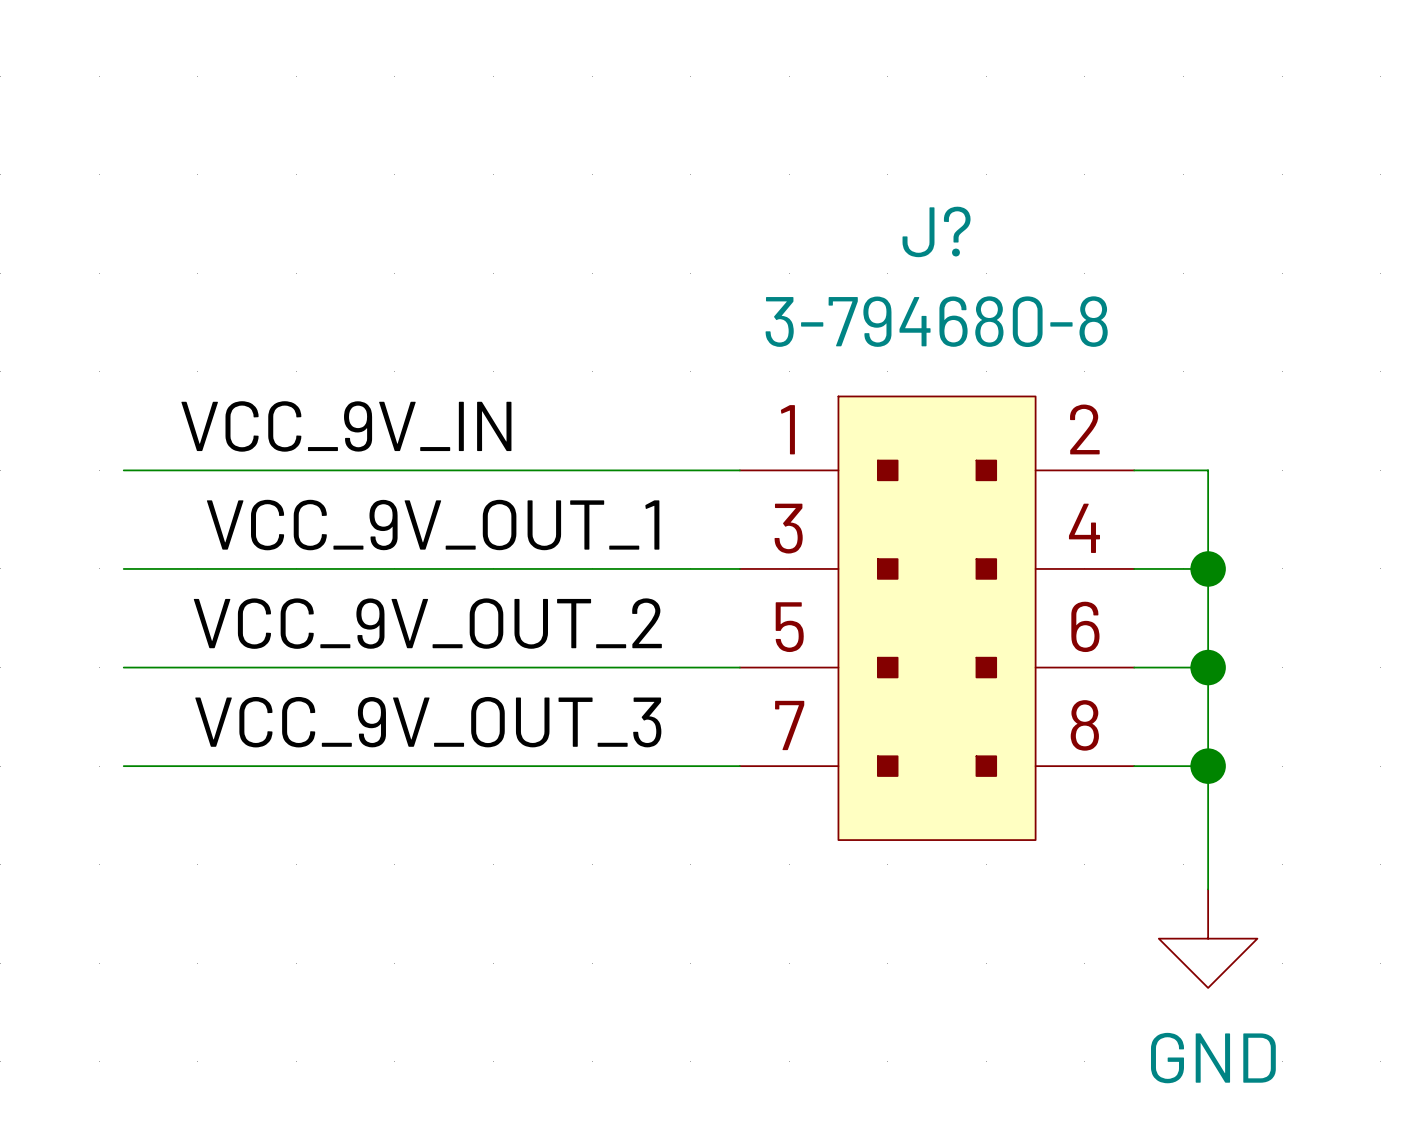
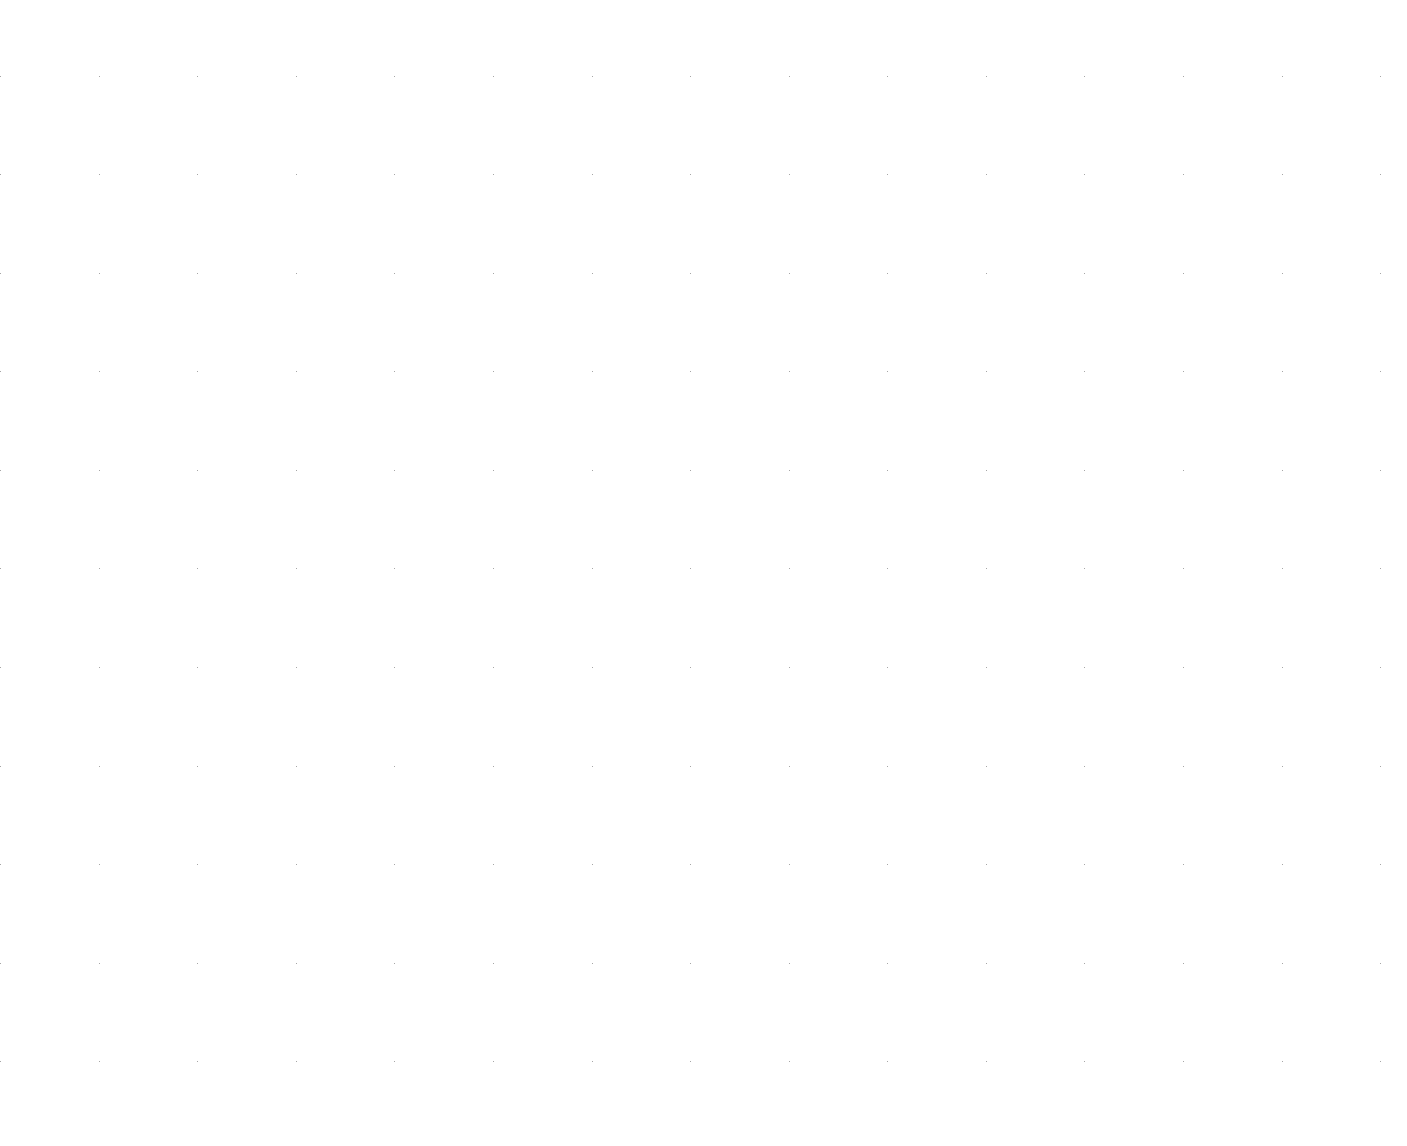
label: VCC_9V_IN (346, 426) -> none
wire: (123, 470) (739, 470) -> none
wire: (1134, 470) (1208, 470) (1208, 889) -> none
label: VCC_9V_OUT_1 (433, 525) -> none
wire: (123, 568) (739, 568) -> none
wire: (1134, 568) (1208, 568) -> none
junction: (1208, 568) -> none
J?: 3-794680-8 (937, 618) -> none
label: VCC_9V_OUT_2 (427, 623) -> none
wire: (123, 667) (739, 667) -> none
wire: (1134, 667) (1208, 667) -> none
junction: (1208, 667) -> none
label: VCC_9V_OUT_3 (428, 722) -> none
wire: (123, 766) (739, 766) -> none
wire: (1134, 766) (1208, 766) -> none
junction: (1208, 766) -> none
power symbol: GND (1208, 938) -> none

